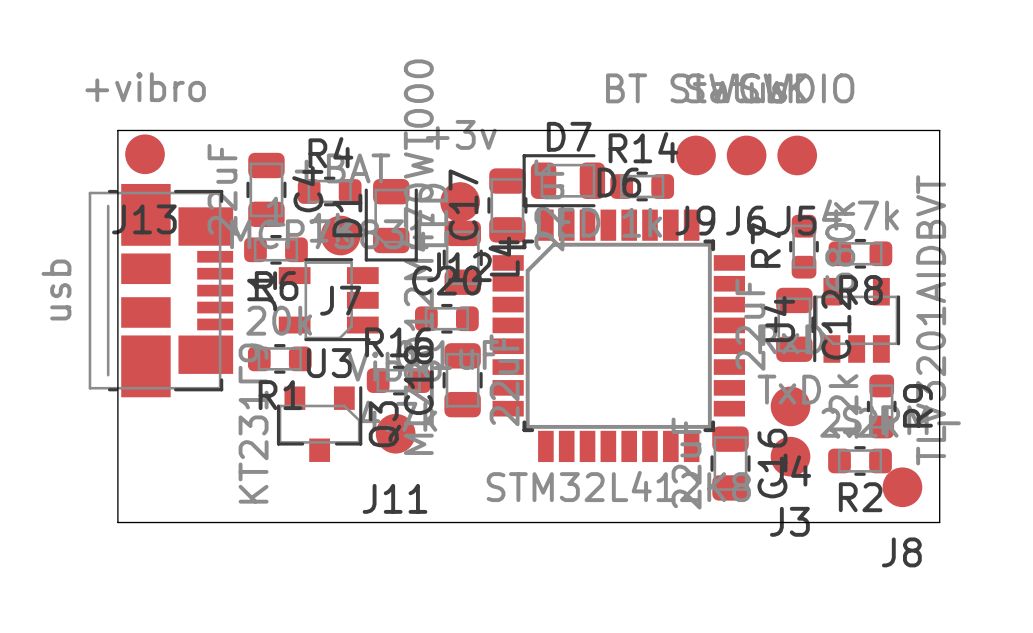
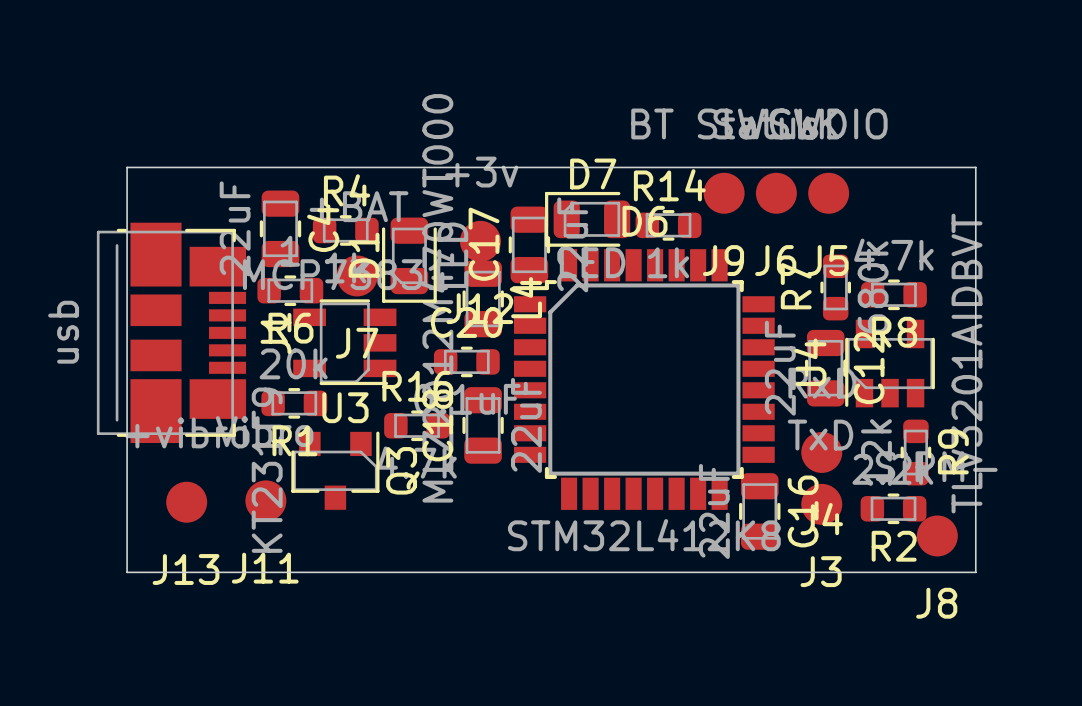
J13 position: (145, 154) -> (186, 502)
J11 position: (395, 433) -> (265, 500)

